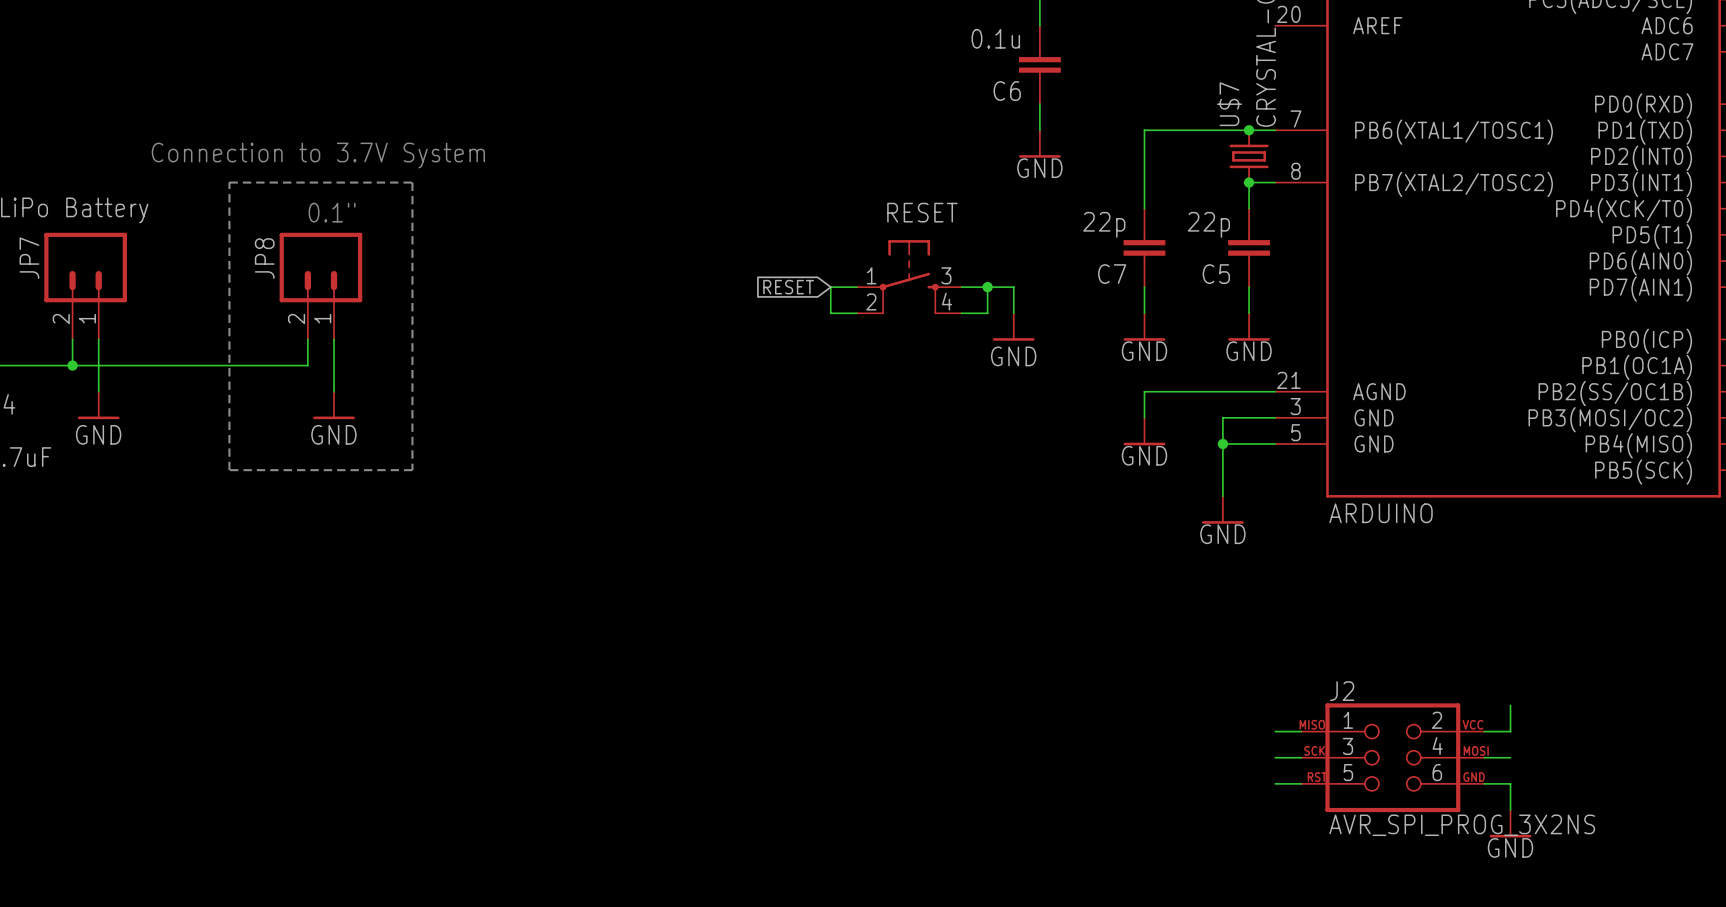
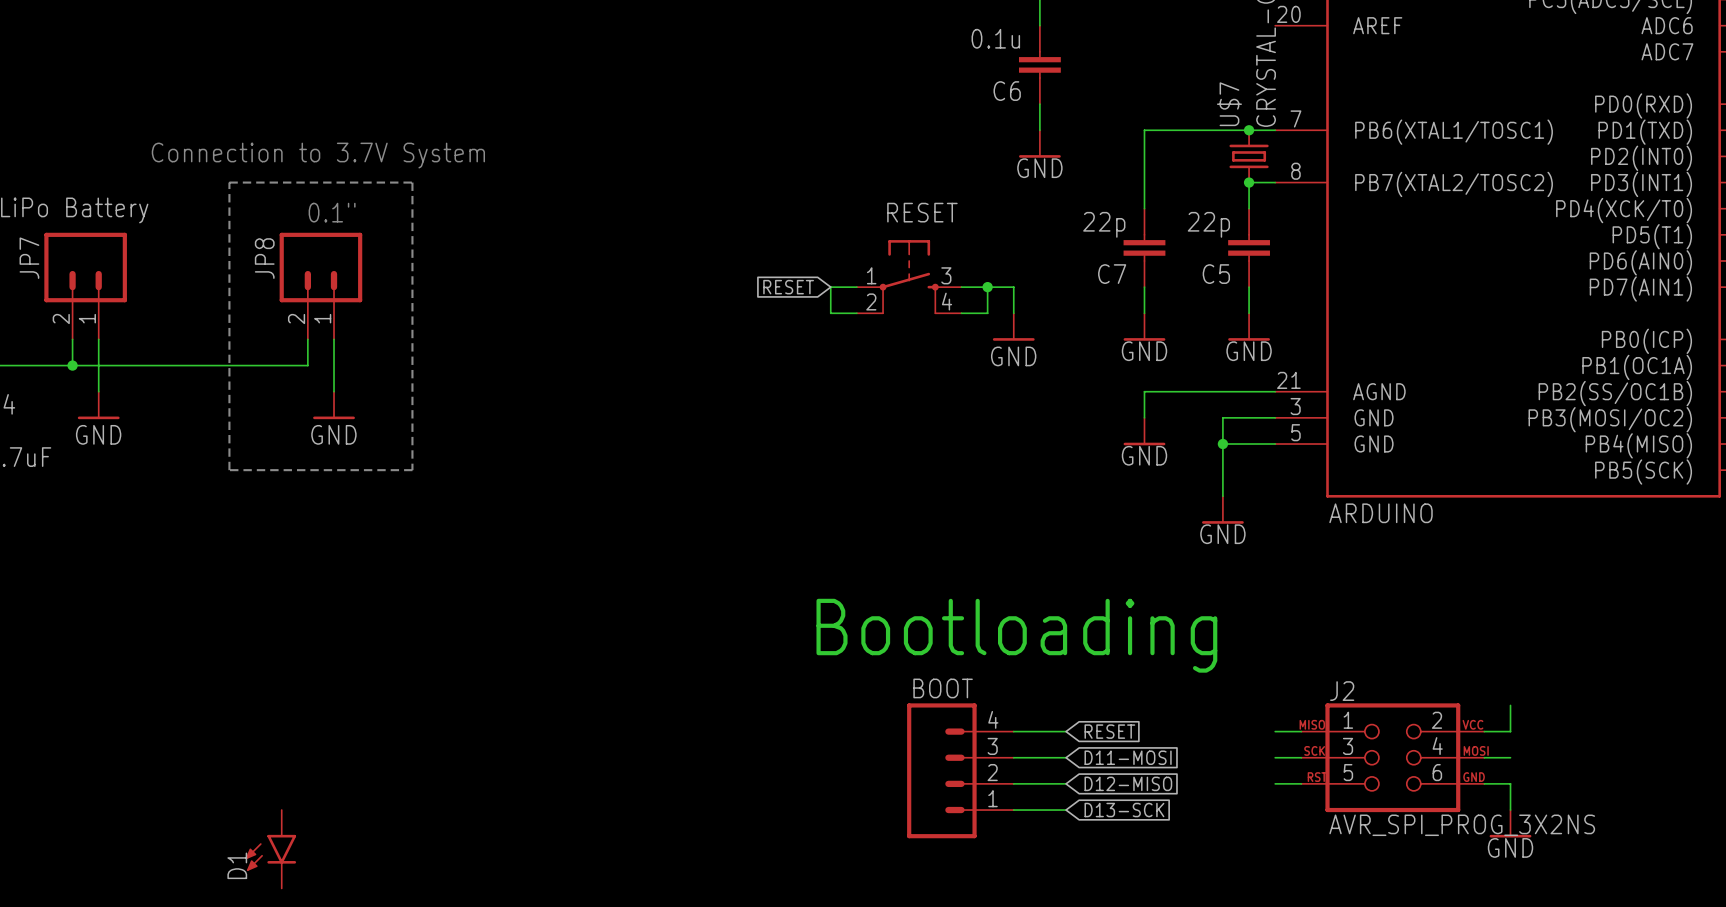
text: none -> Bootloading (1016, 635)
wire: none -> (1013, 731) (1066, 731)
global label: none -> RESET (1109, 731)
wire: none -> (1013, 757) (1066, 757)
global label: none -> D11-MOSI (1128, 757)
BOOT: none -> (960, 770)
wire: none -> (1013, 783) (1066, 783)
global label: none -> D12-MISO (1128, 783)
wire: none -> (1013, 810) (1066, 810)
global label: none -> D13-SCK (1124, 810)
D1: none -> (270, 849)

